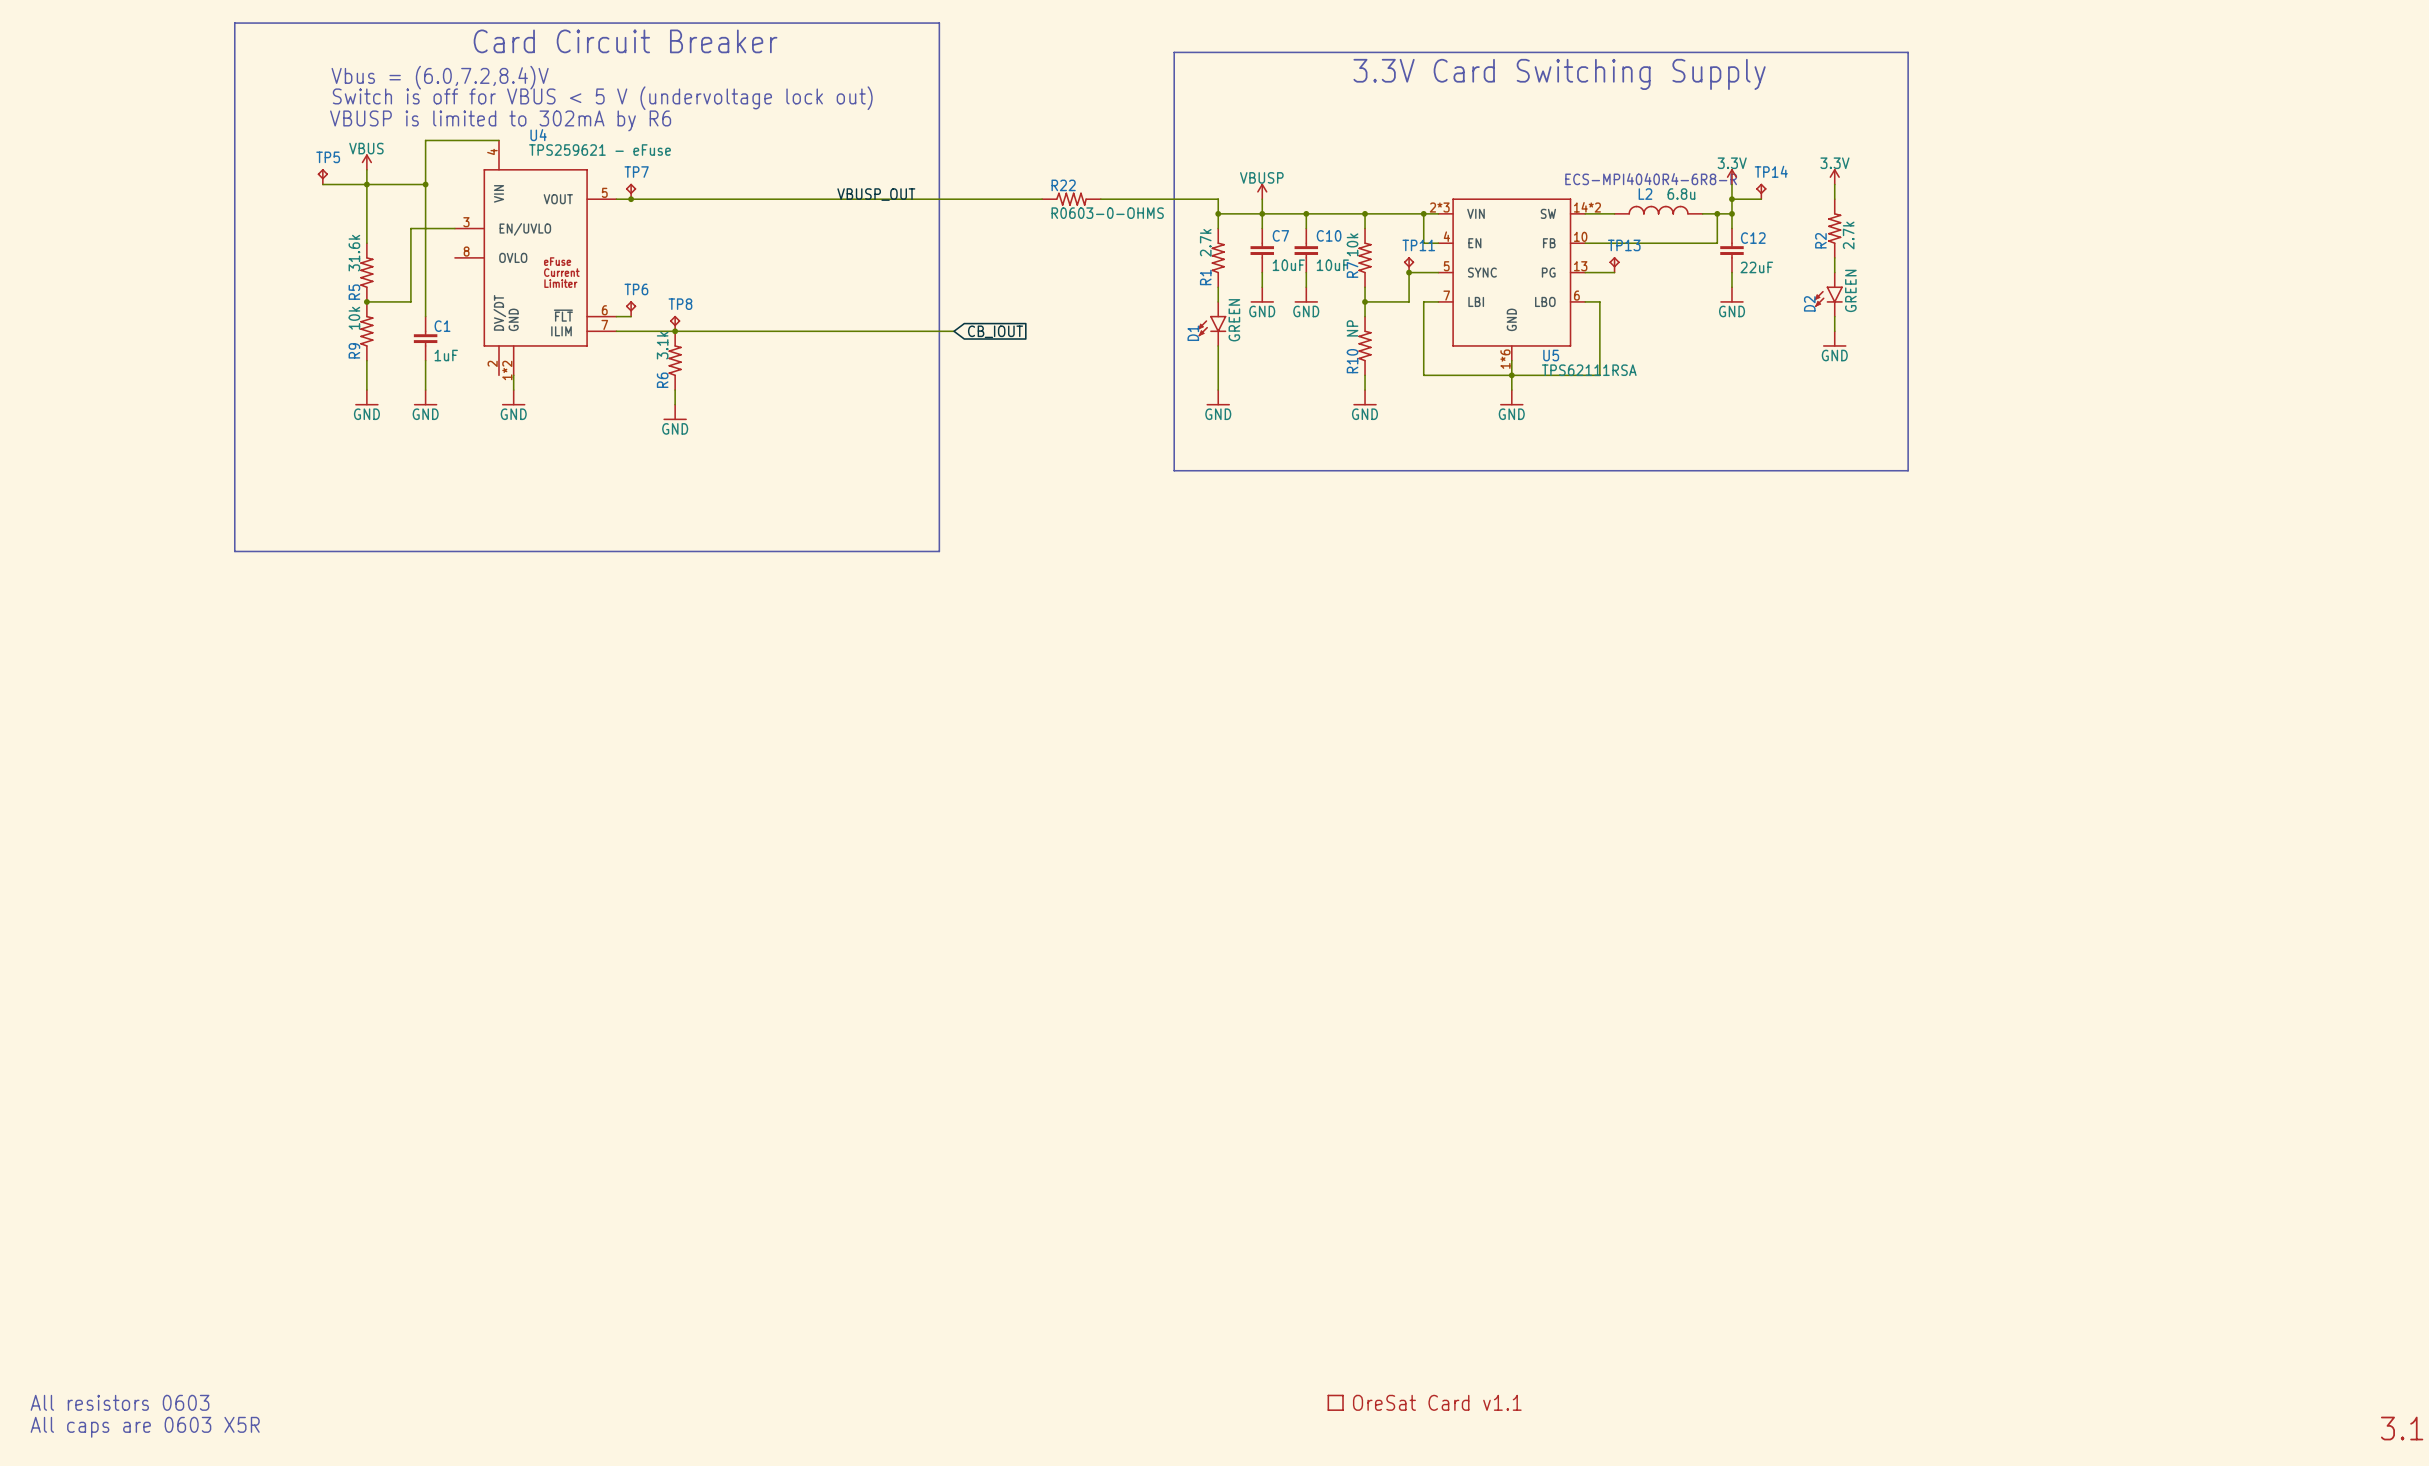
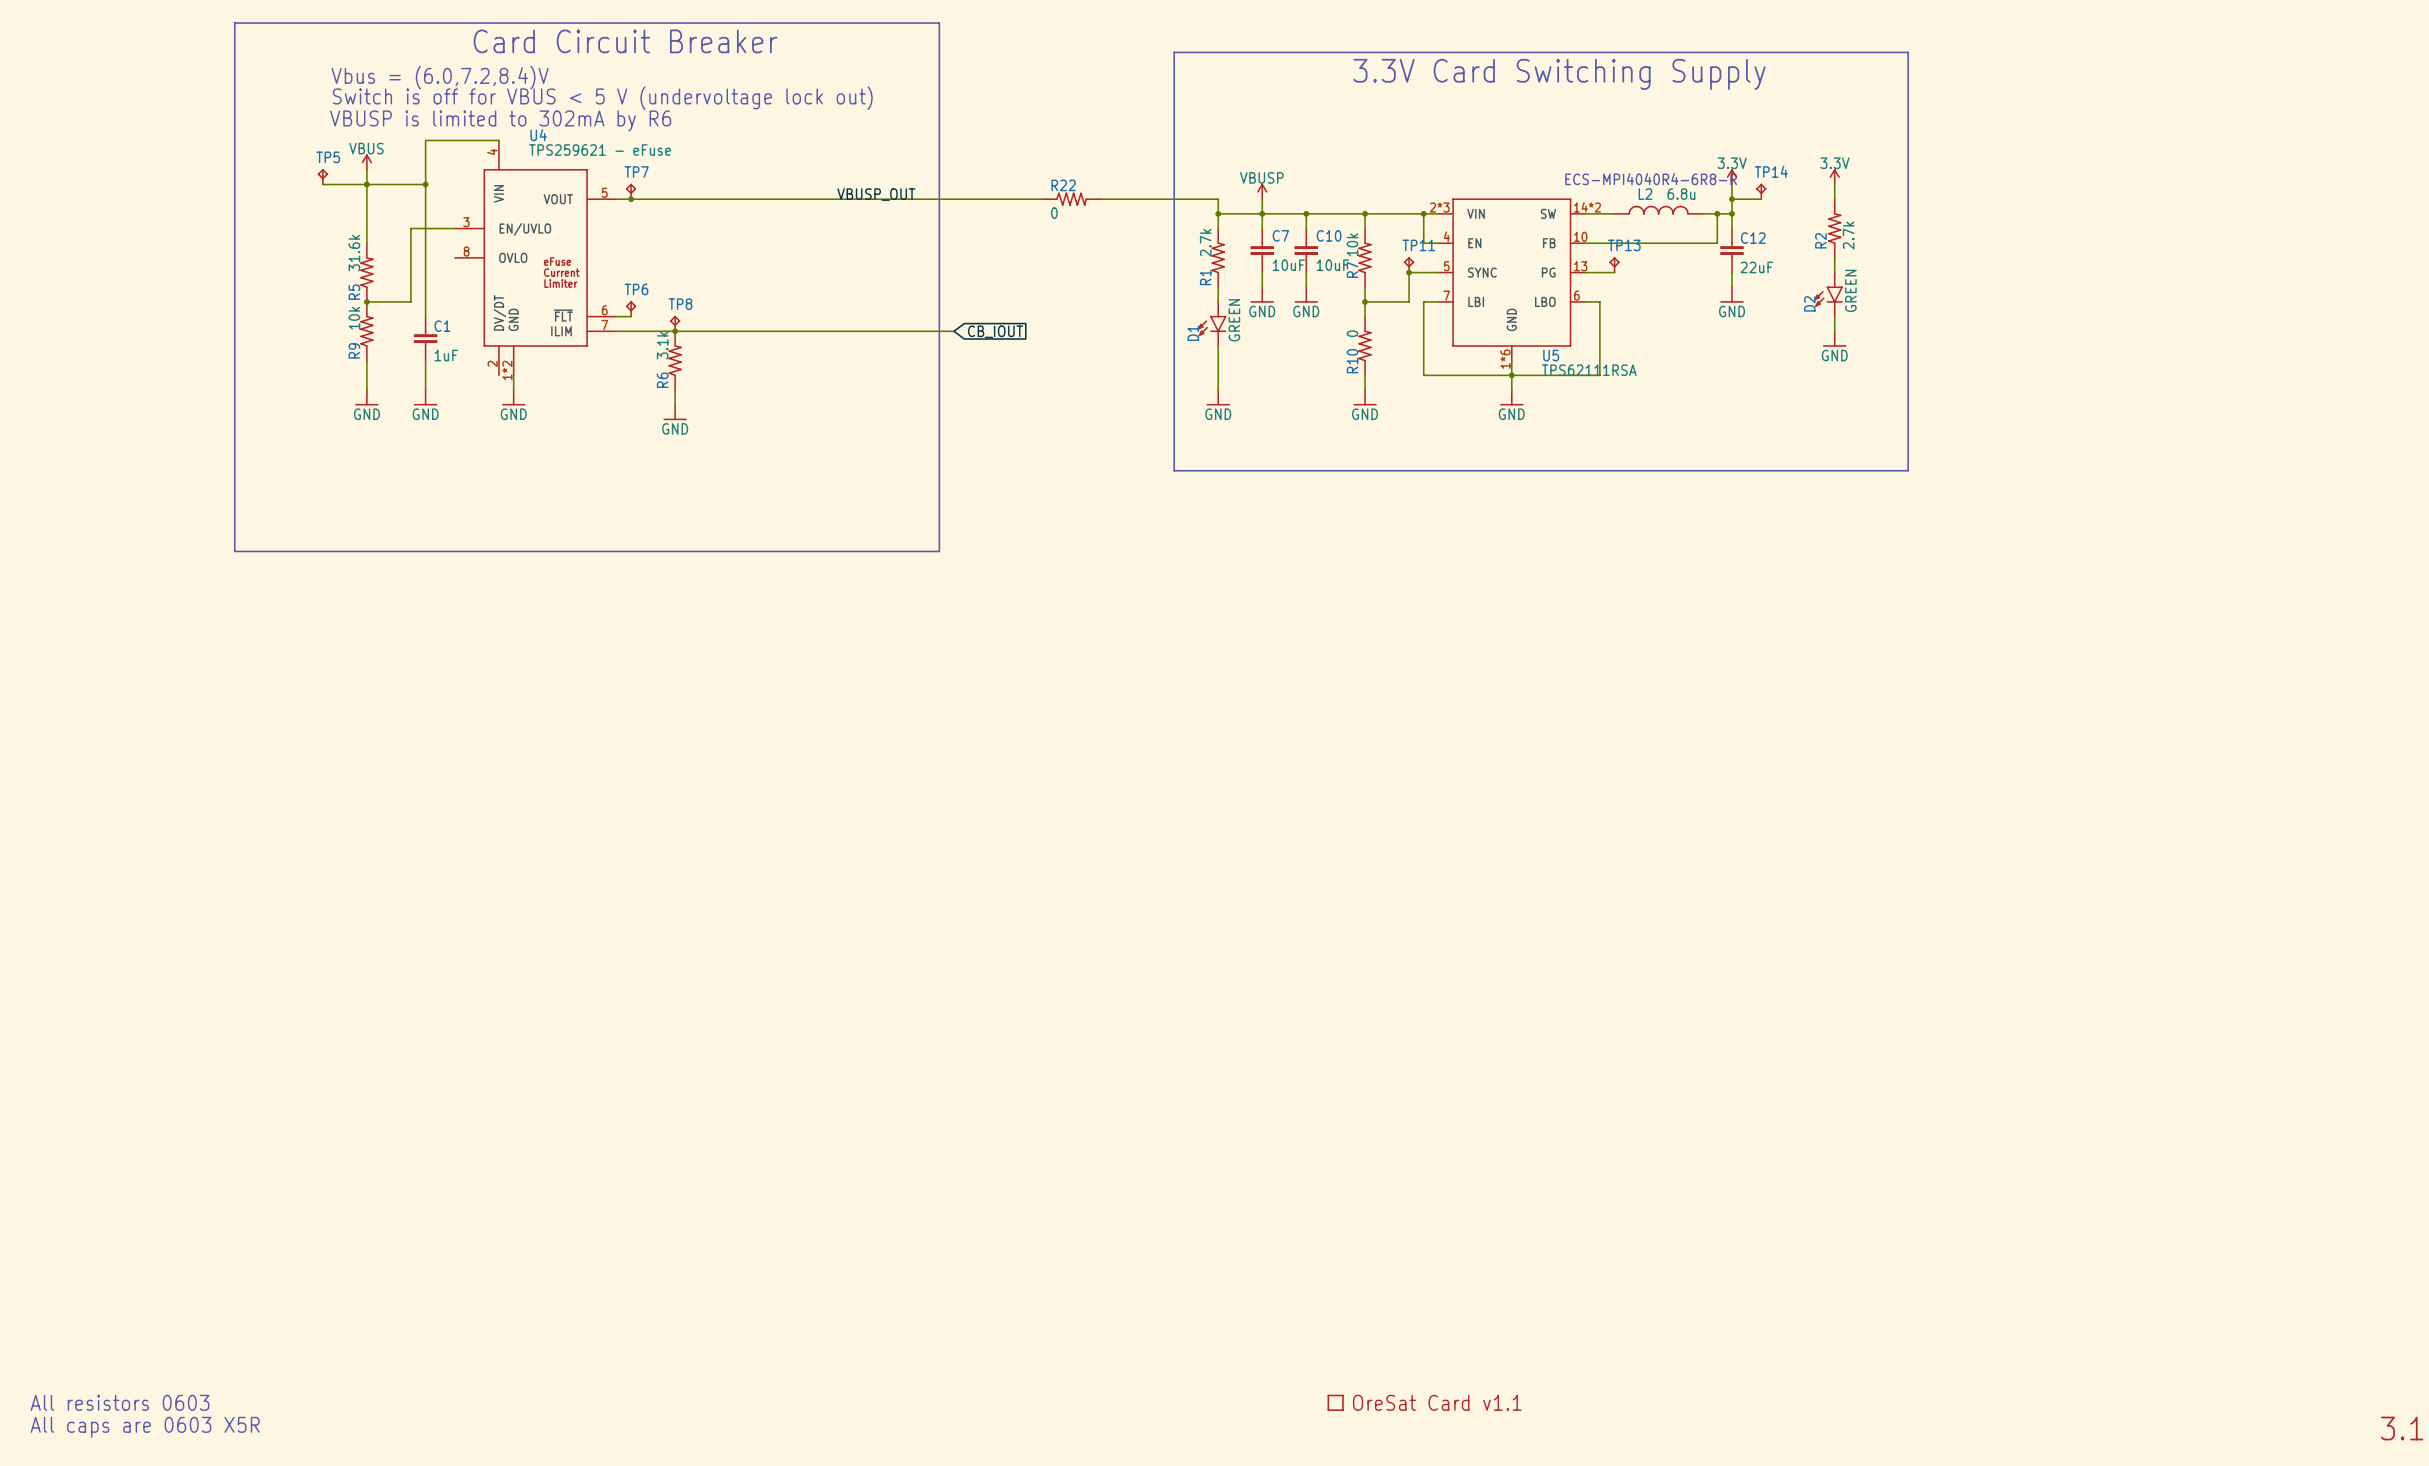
R22 value: R0603-0-OHMS (1107, 213) -> 0 (1054, 213)
R10 value: NP (1352, 328) -> 0 (1352, 333)

